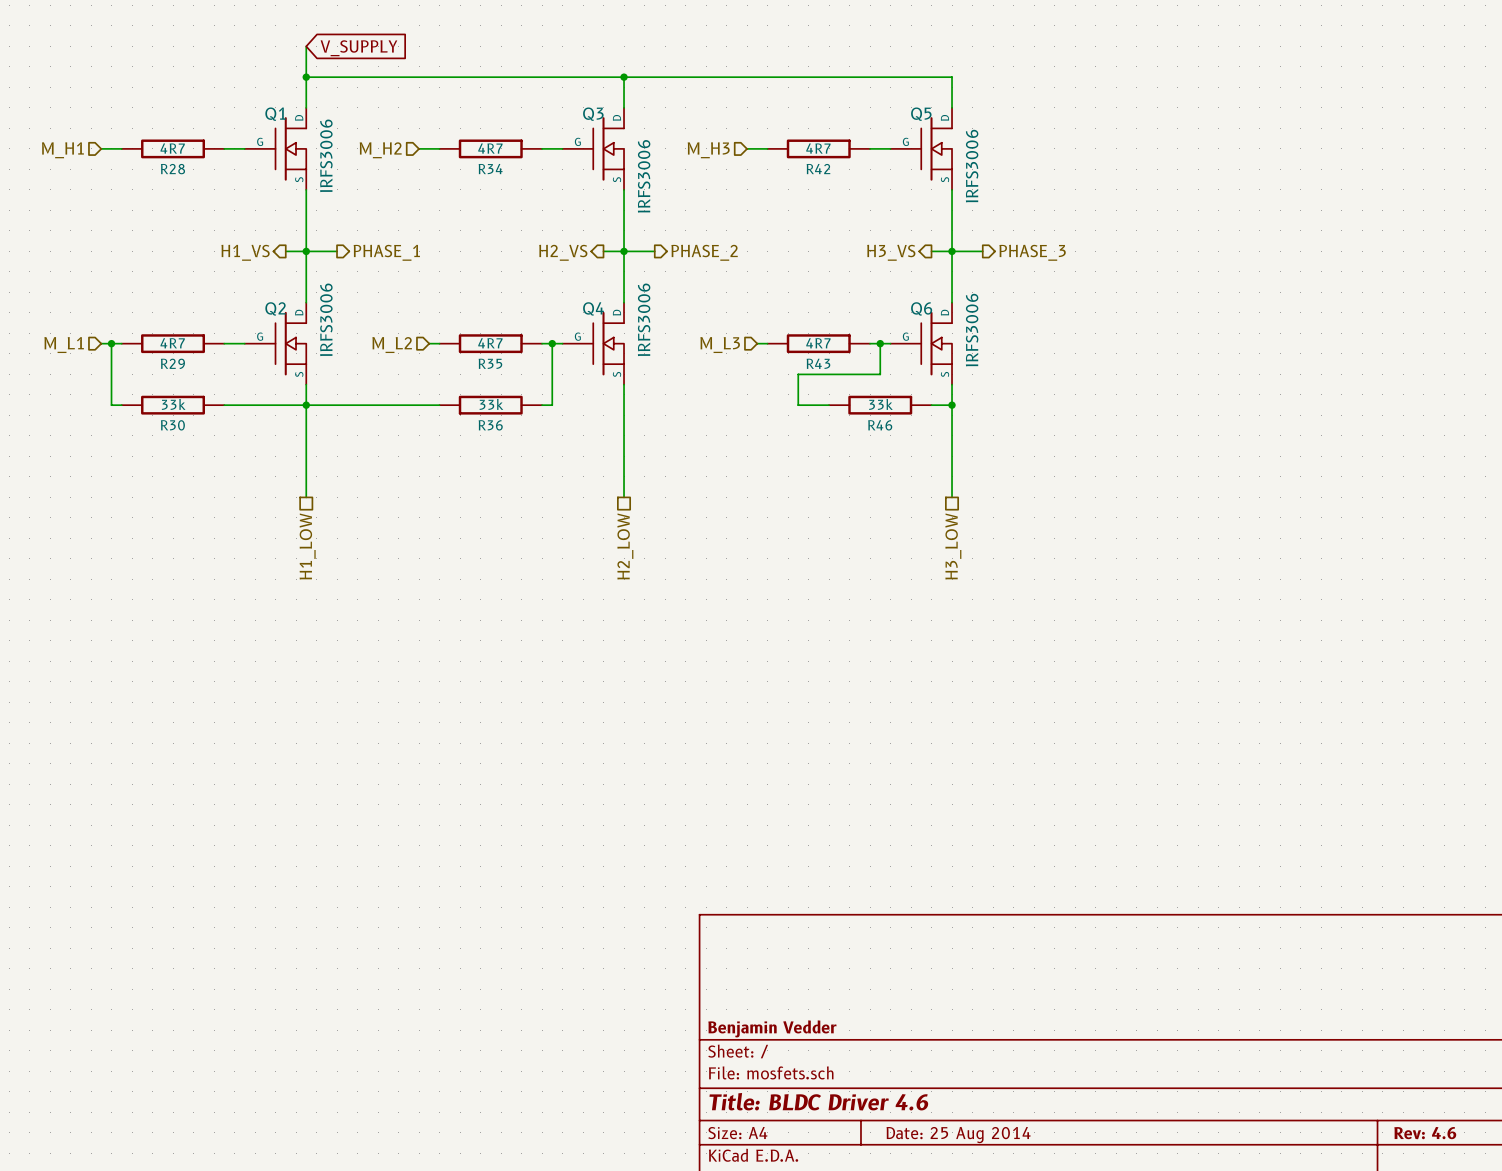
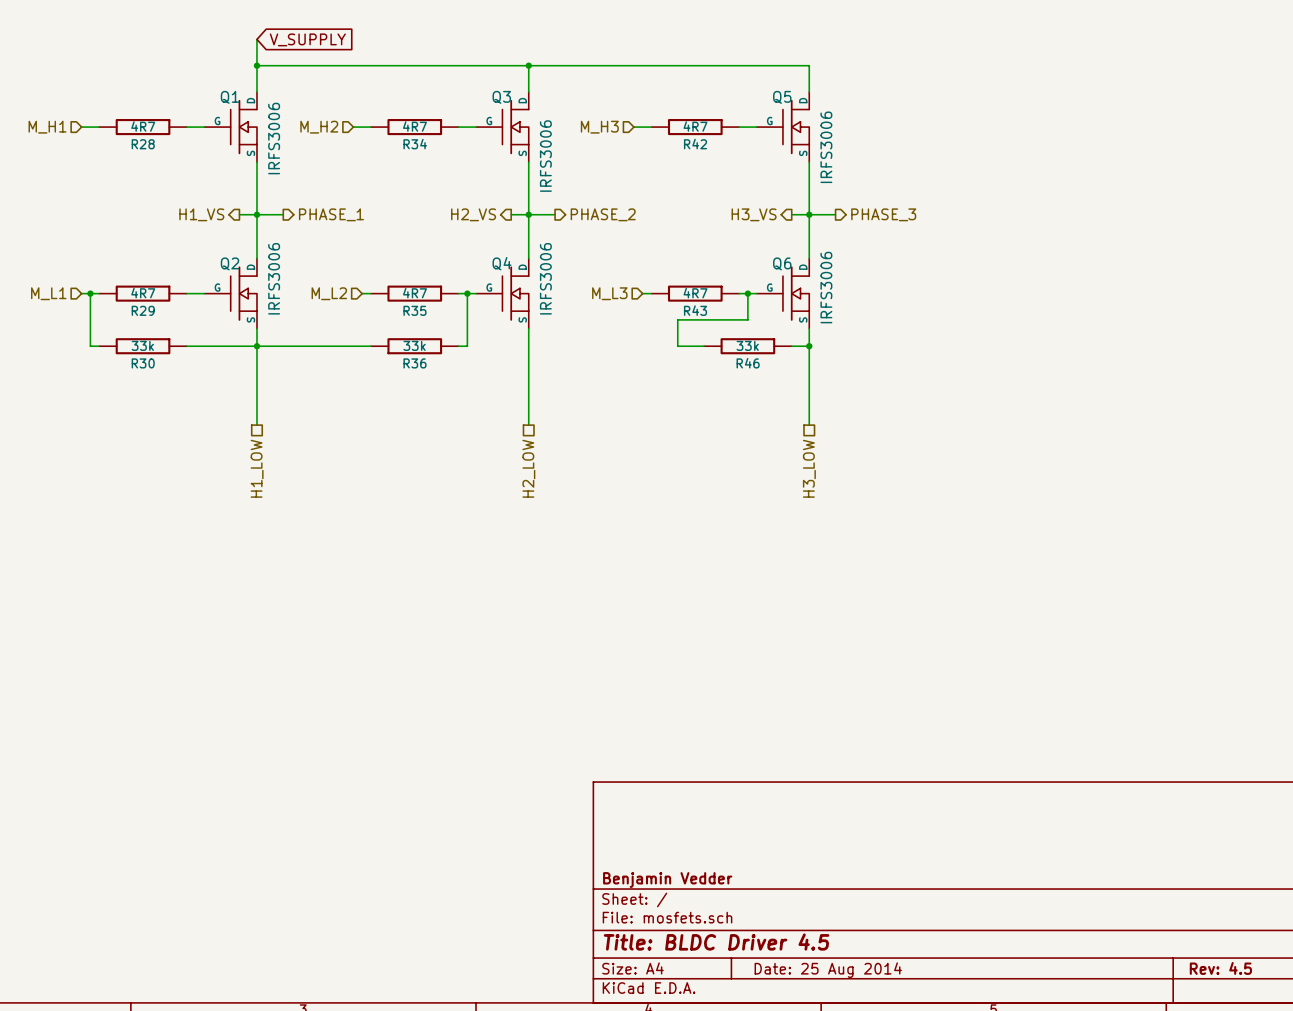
title block: Title: BLDC Driver 4.6 (818, 1101) -> Title: BLDC Driver 4.5 (716, 942)
title block: Rev: 4.6 (1425, 1133) -> Rev: 4.5 (1220, 968)

